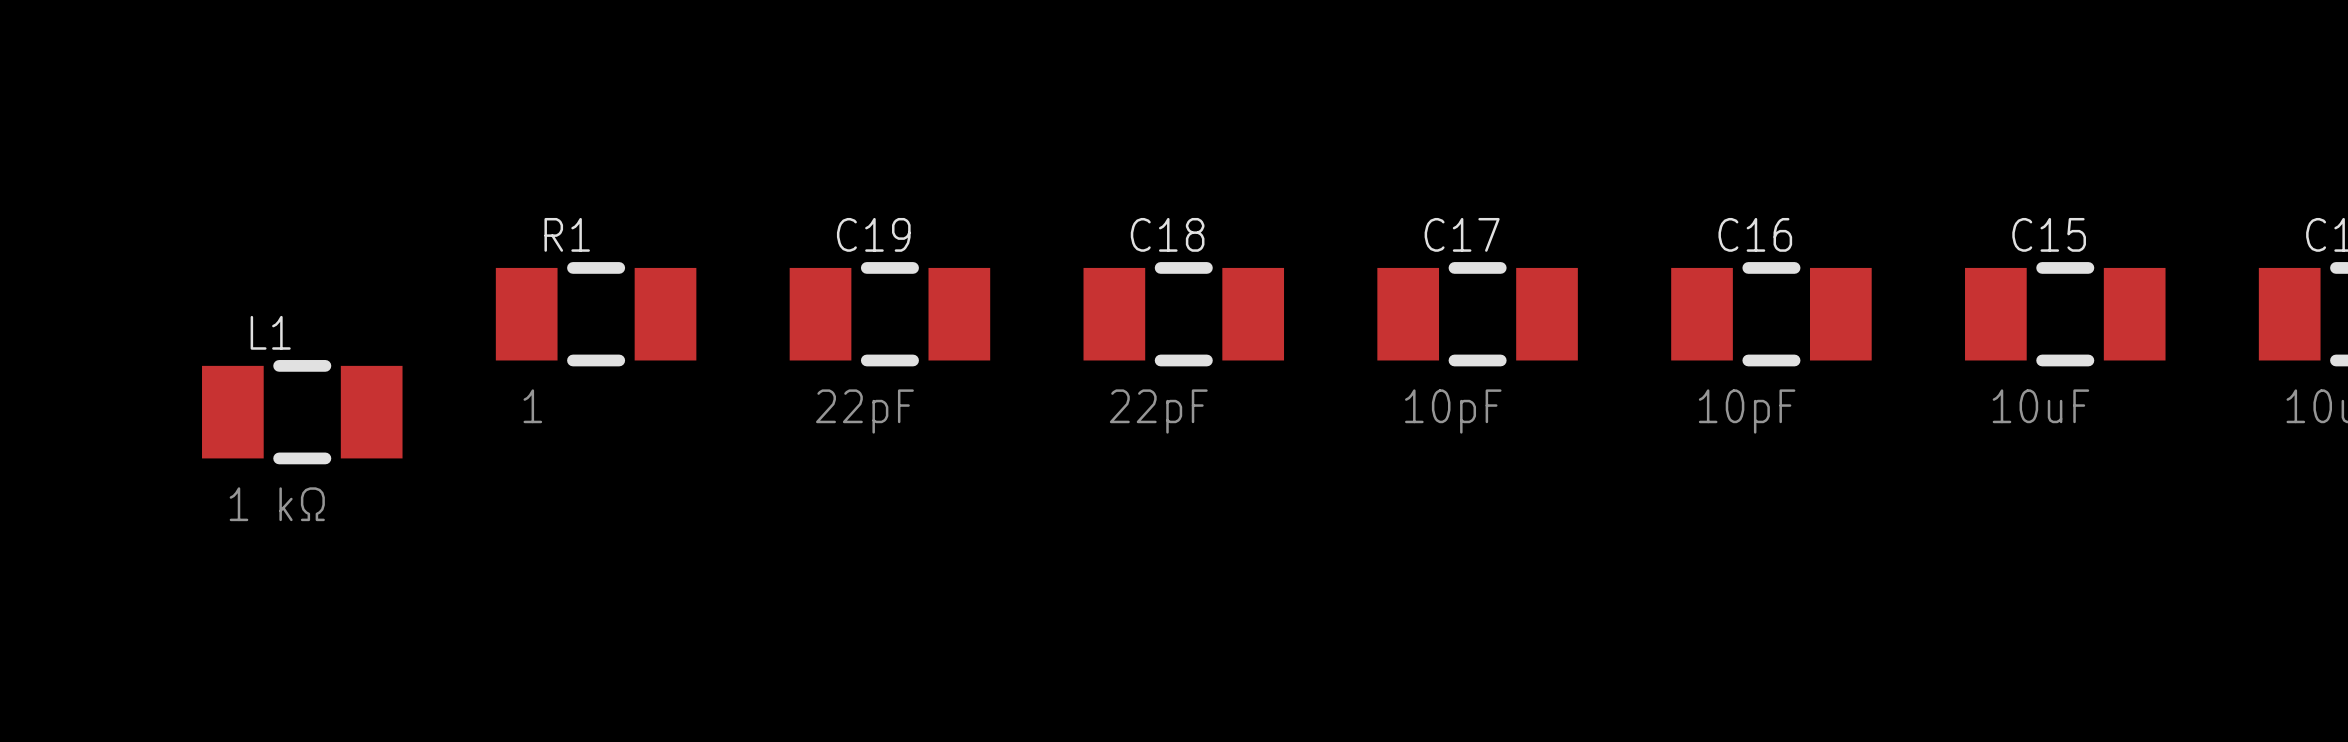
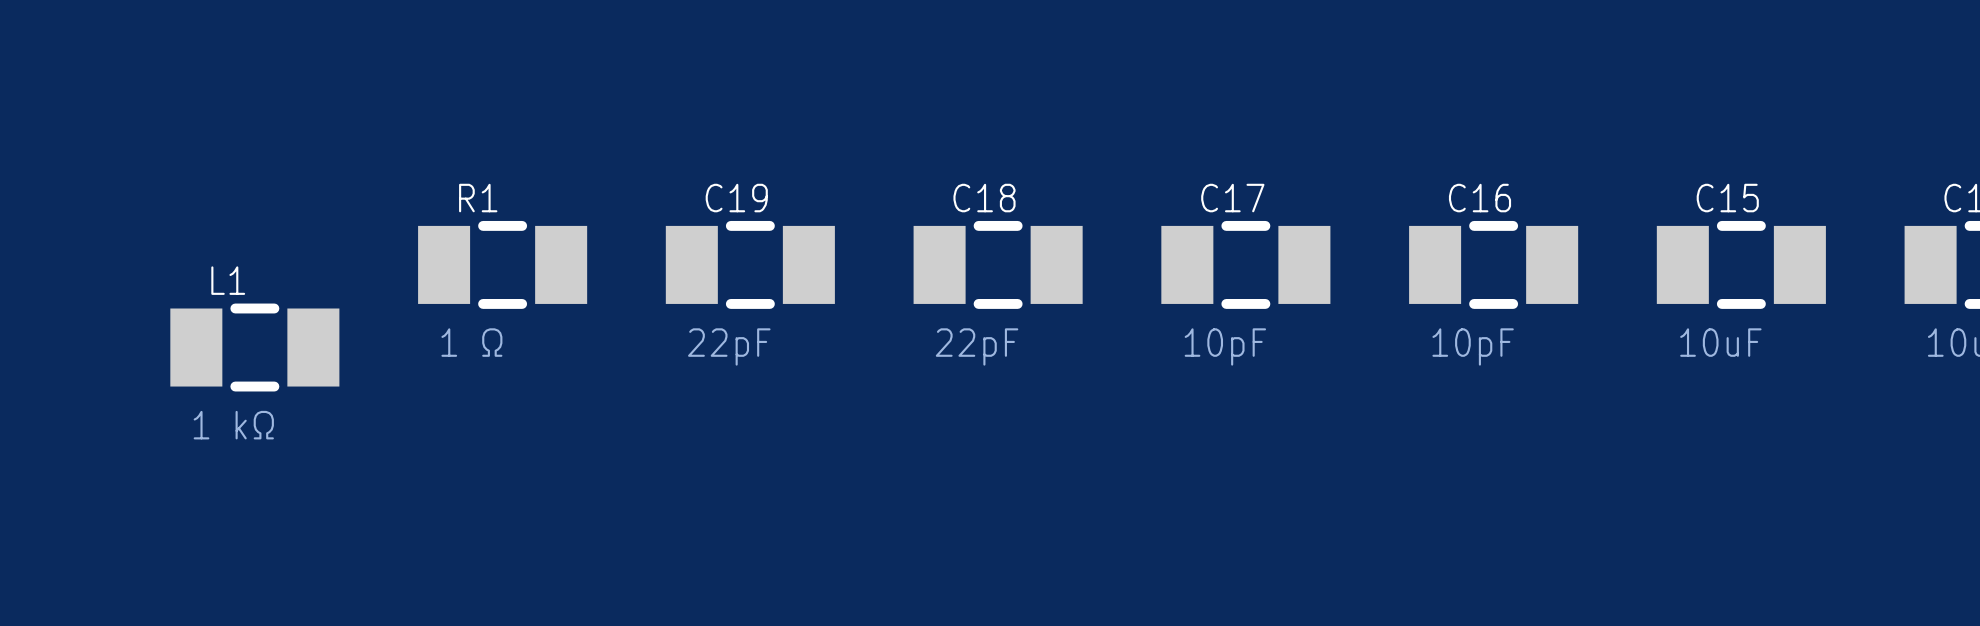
R1 value: 1 (532, 406) -> 1 Ω (471, 342)

